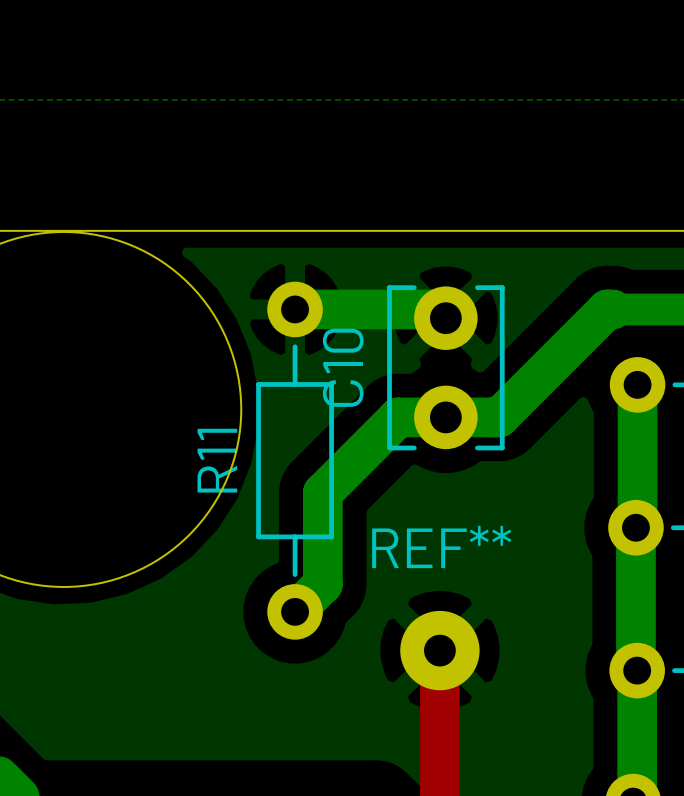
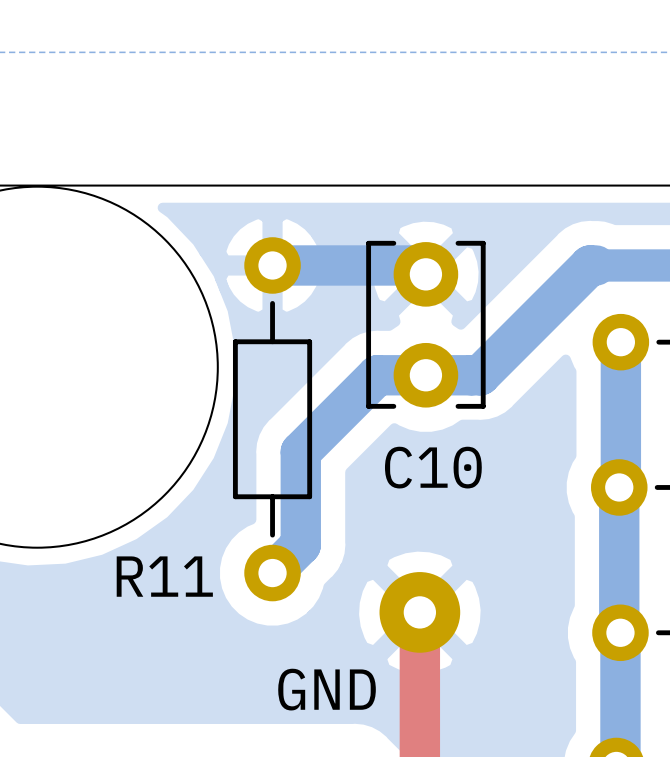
C10 name rotation: 0° (343, 367) -> 90° clockwise (433, 467)
C10 name position: C10 (343, 367) -> C10 (433, 467)
R11 name rotation: 0° (217, 460) -> 90° clockwise (164, 576)
R11 name position: R11 (217, 460) -> R11 (164, 576)
REF** name: REF** (441, 546) -> GND (327, 689)

